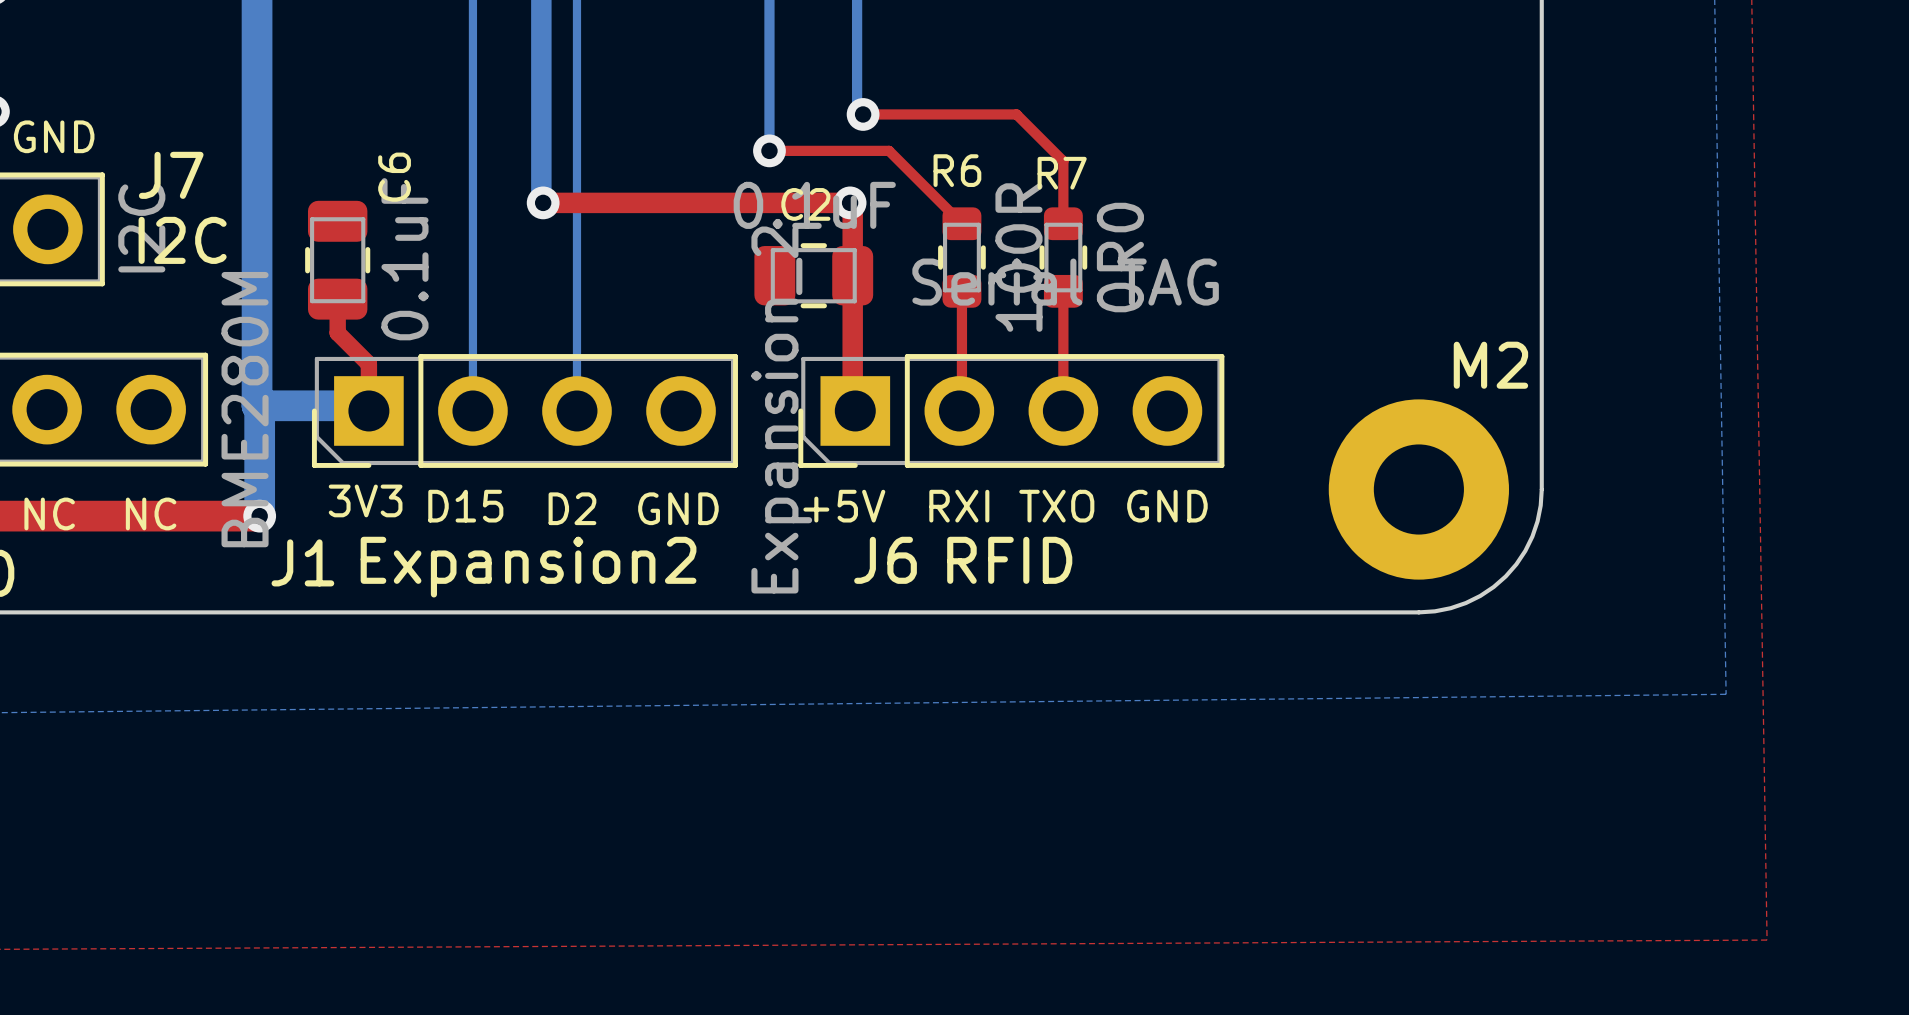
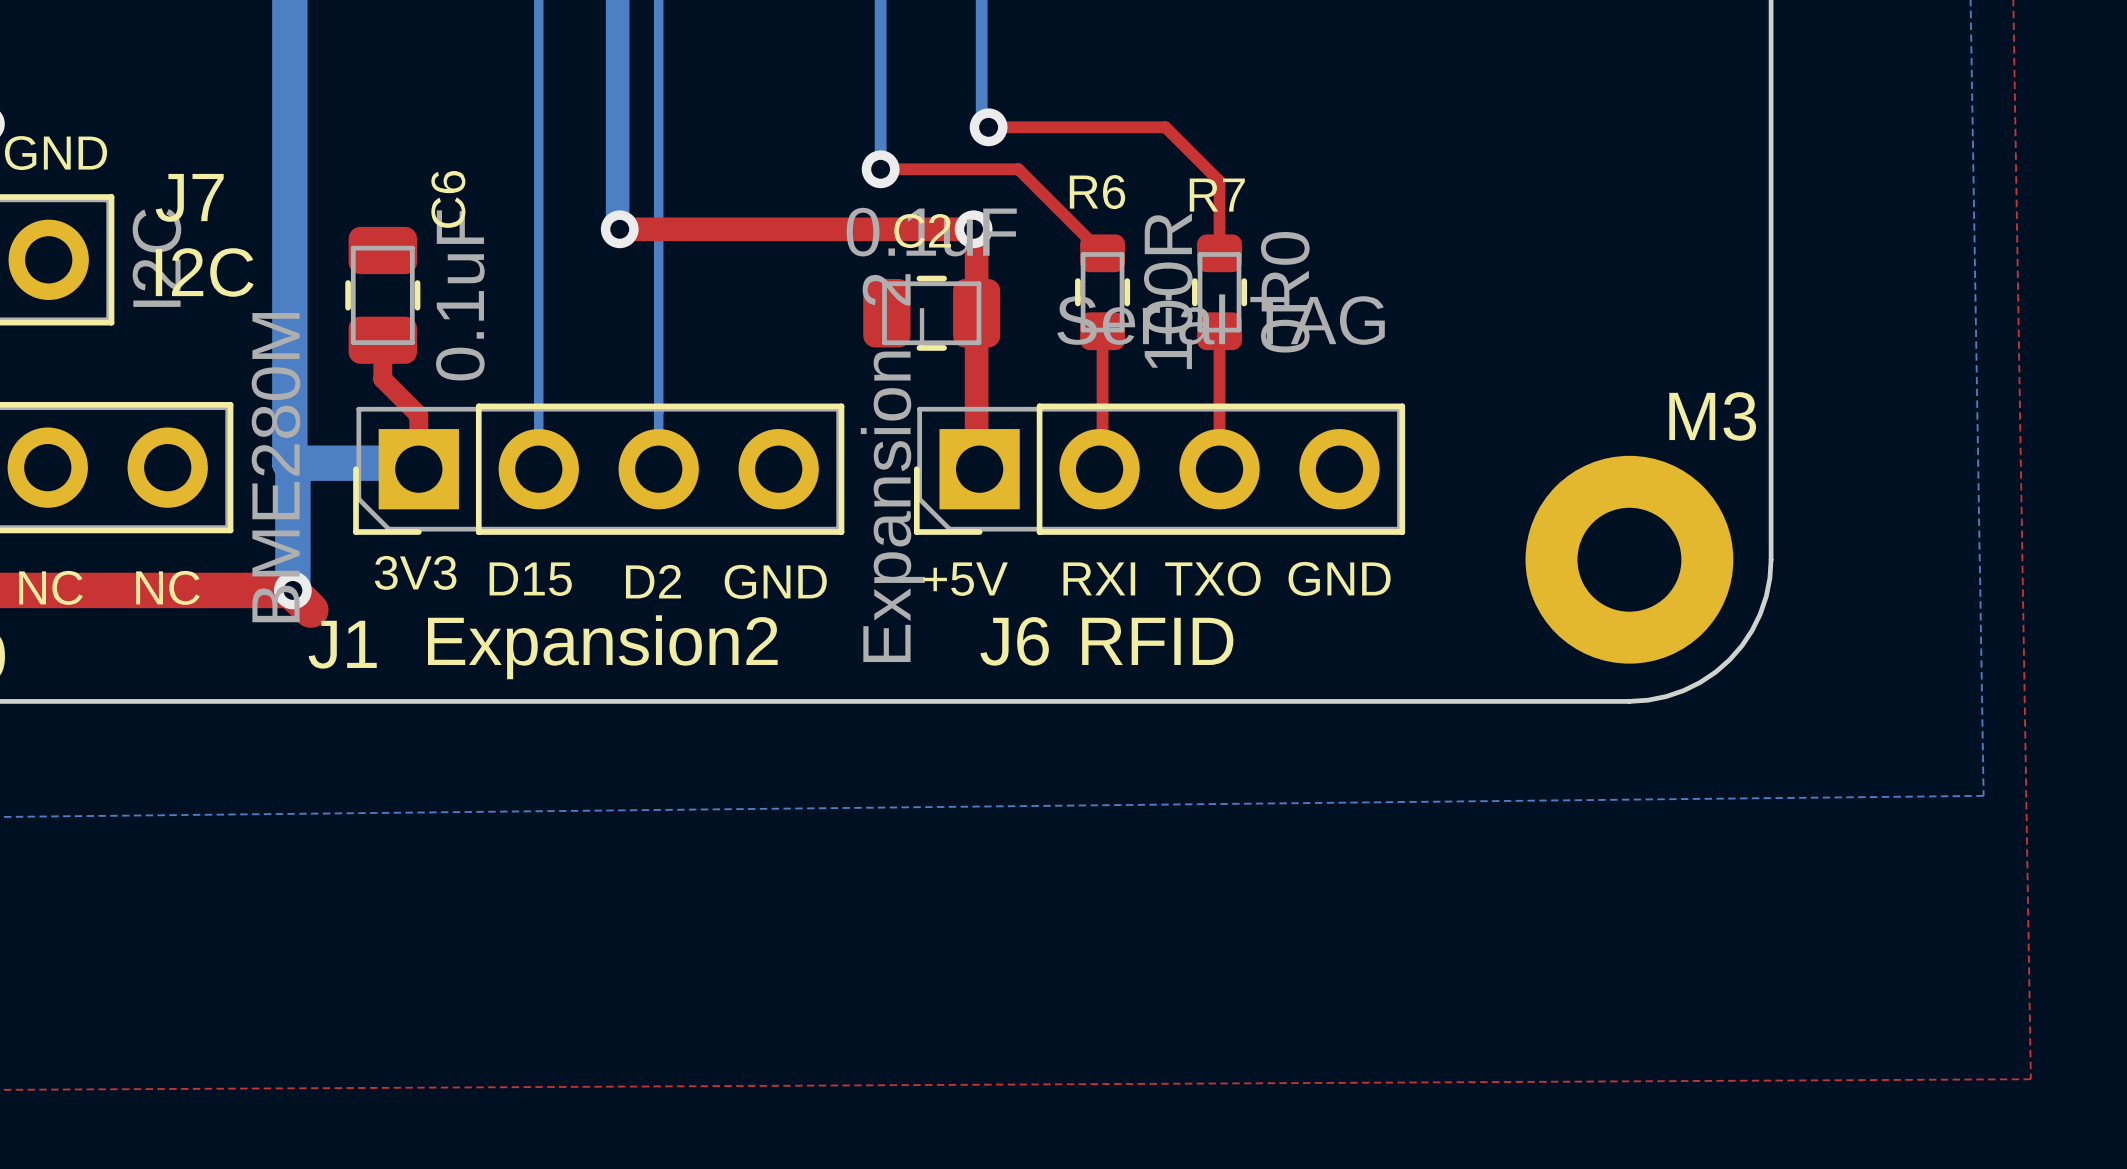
M2 name: M2 (1490, 365) -> M3 (1712, 416)
top track: none -> (292, 590) (310, 610)

